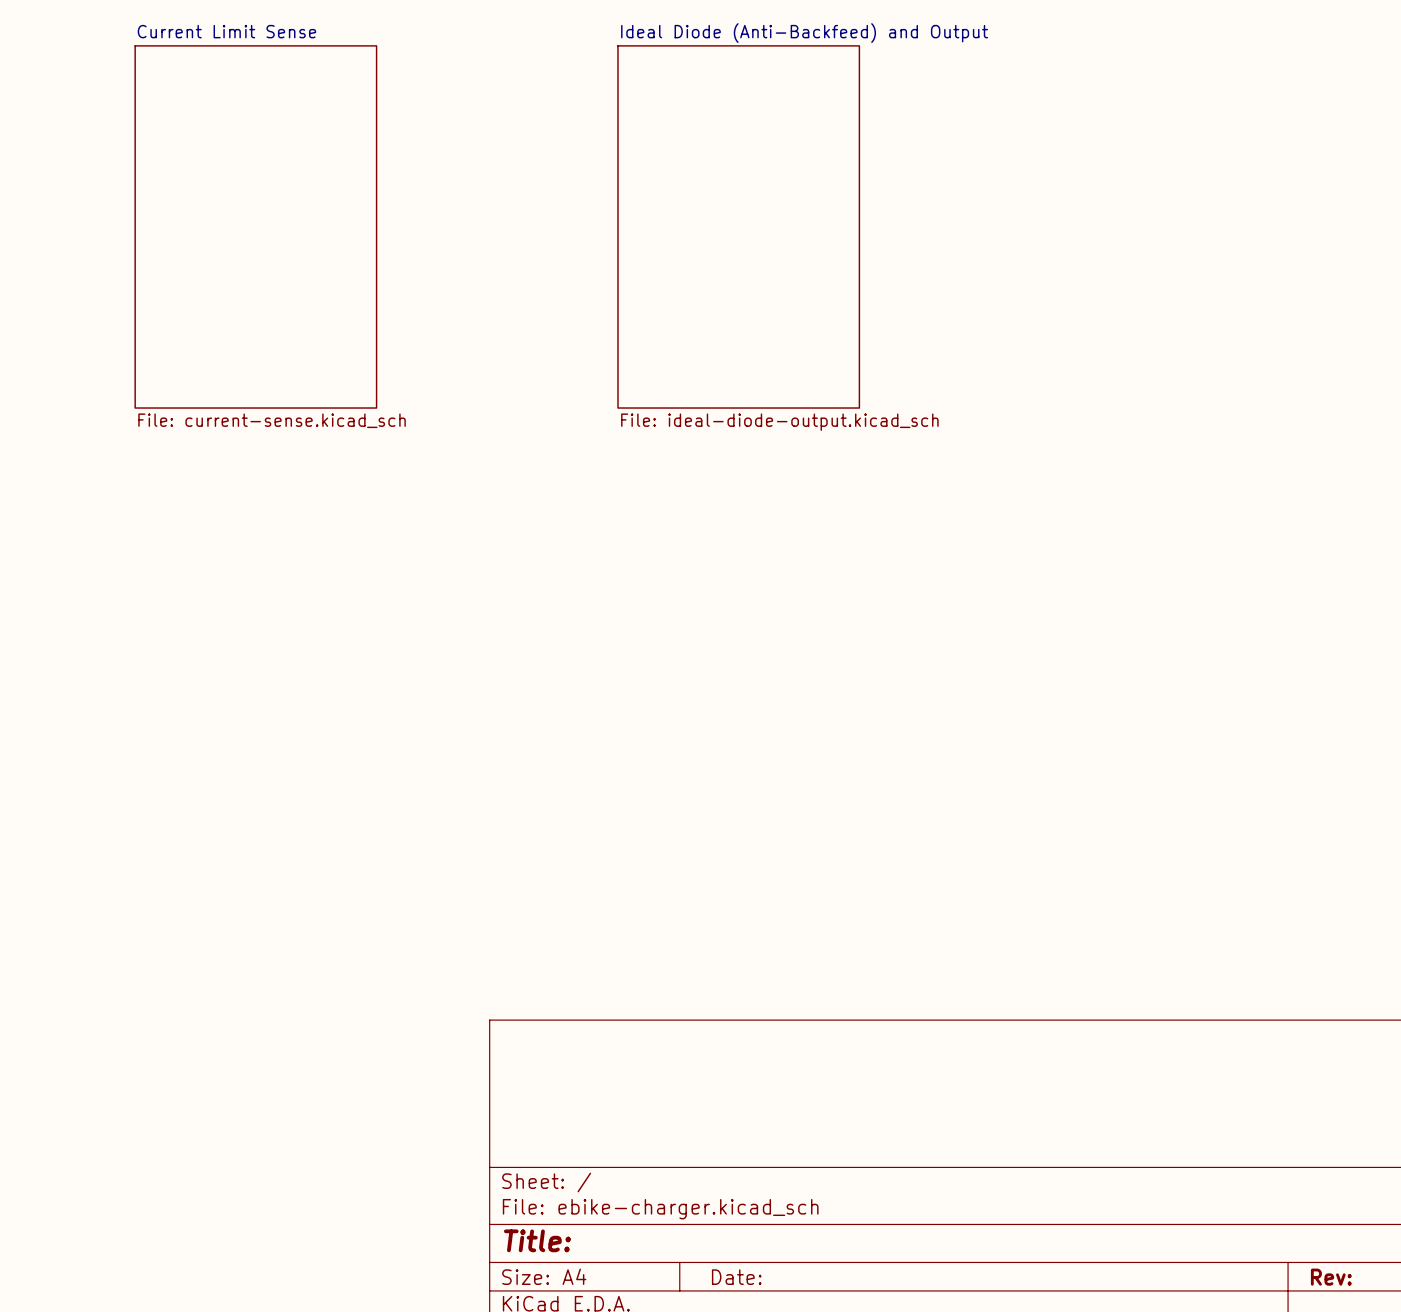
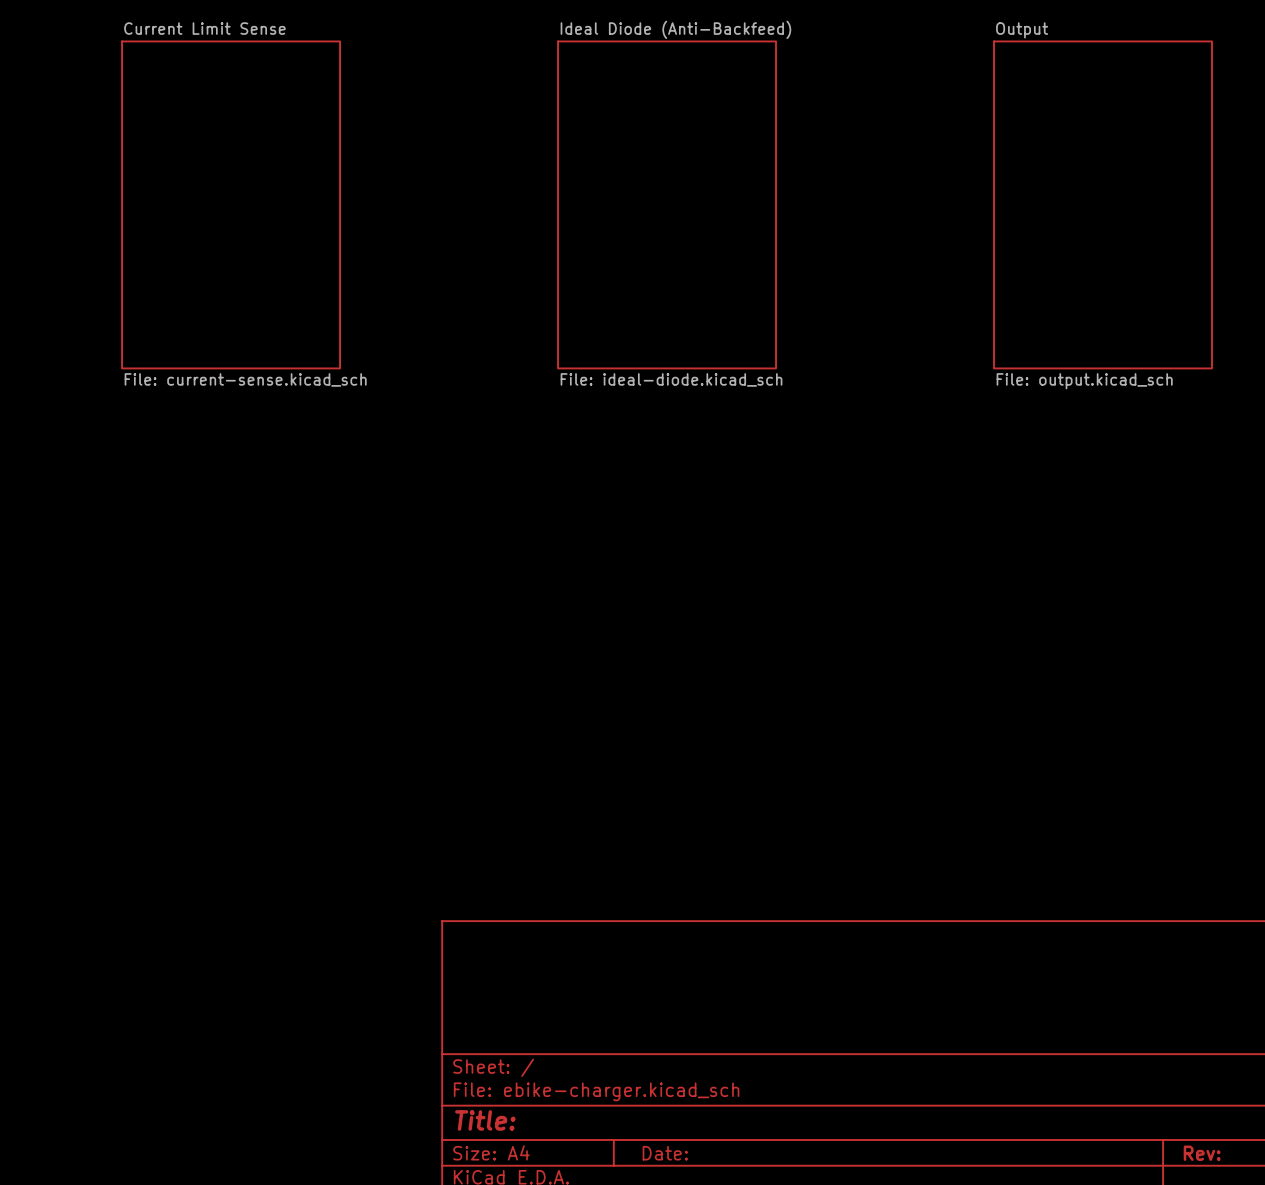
sheet Ideal Diode (Anti-Backfeed) and Output name: Ideal Diode (Anti-Backfeed) and Output (804, 33) -> Ideal Diode (Anti-Backfeed) (675, 29)
sheet Output: none -> File: output.kicad_sch (1103, 204)
sheet Ideal Diode (Anti-Backfeed) and Output value: File: ideal-diode-output.kicad_sch (779, 422) -> File: ideal-diode.kicad_sch (671, 379)

